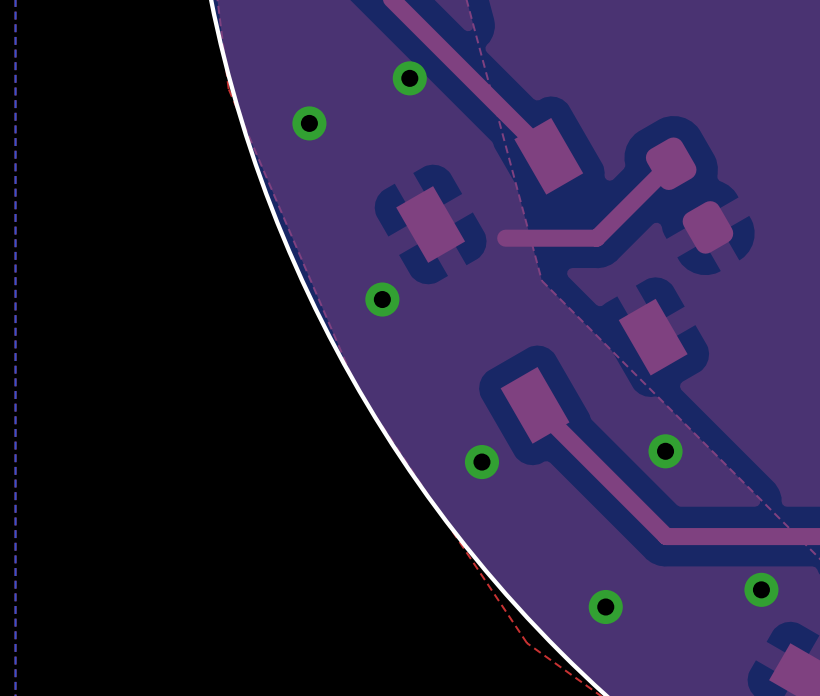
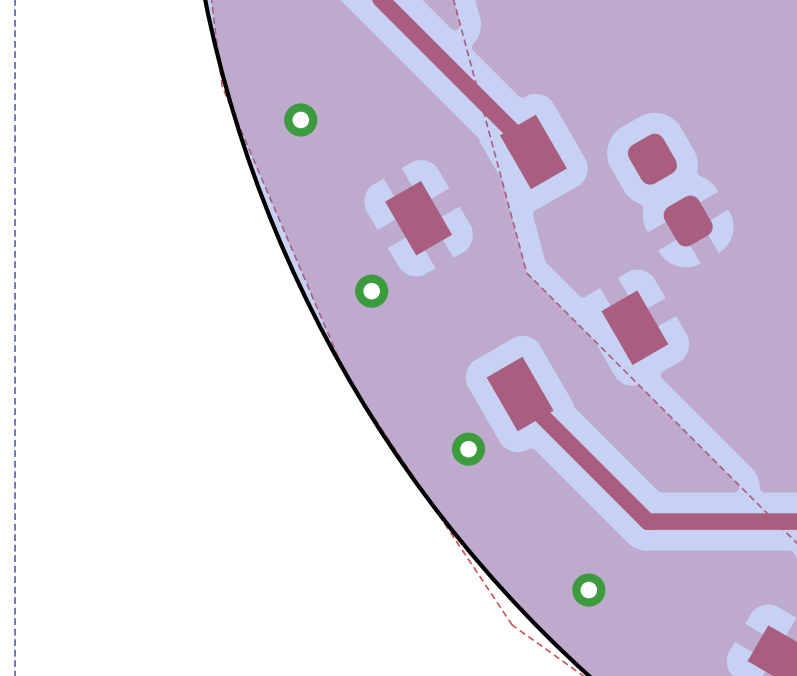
via: (409, 78) -> none
top track: (671, 163) (596, 238) (505, 238) -> none
via: (665, 451) -> none
via: (761, 589) -> none

